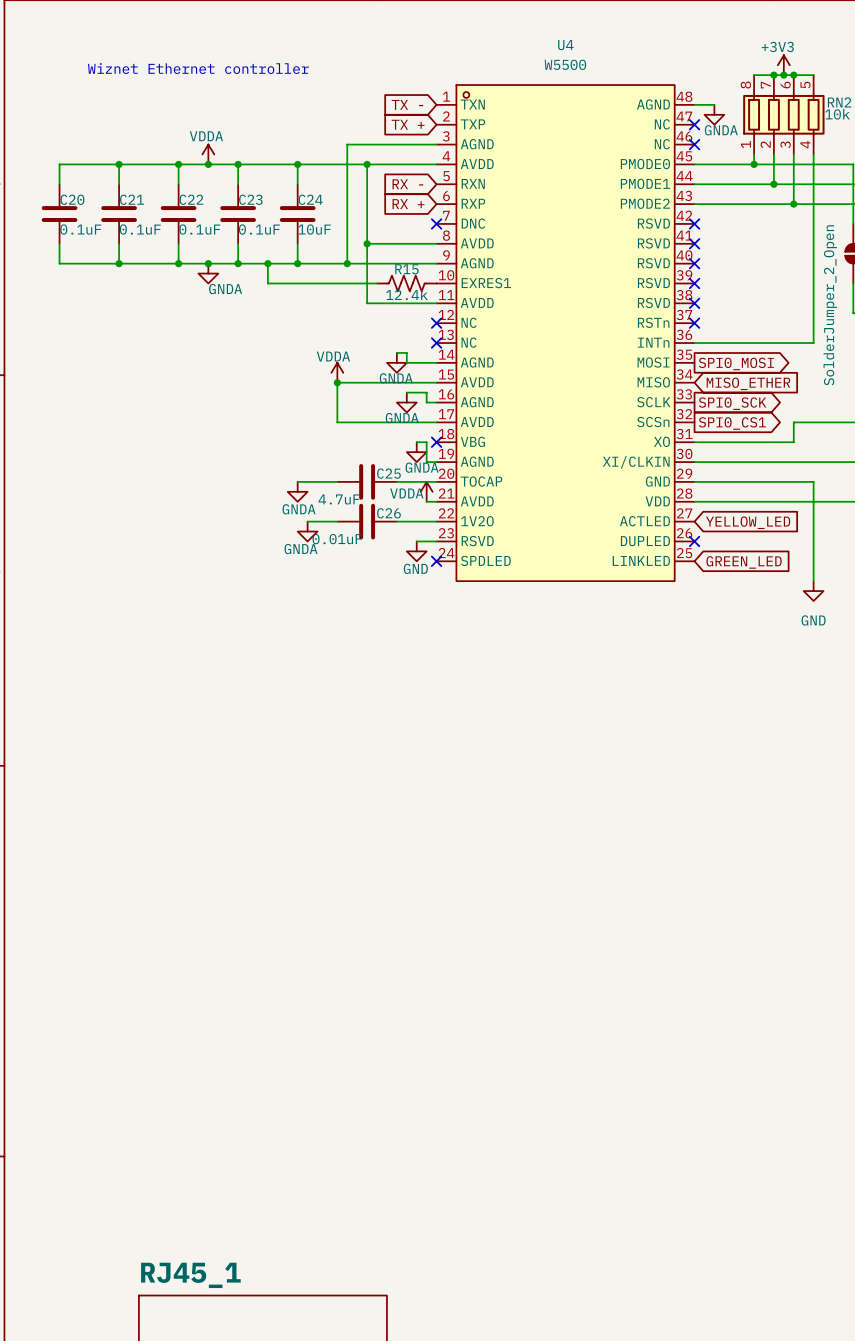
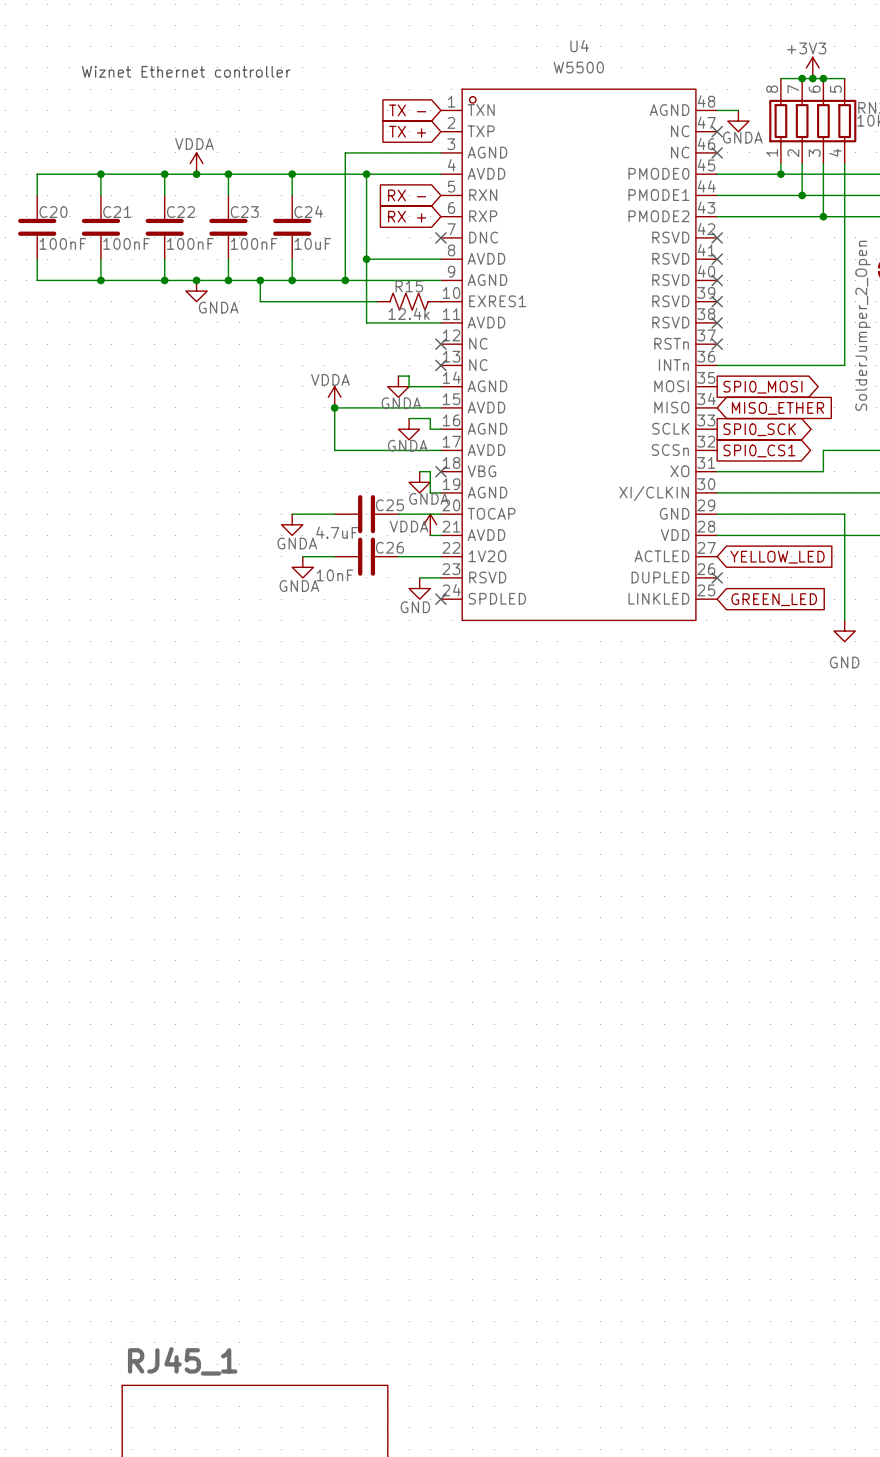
C20 value: 0.1uF (80, 229) -> 100nF (62, 243)
C21 value: 0.1uF (140, 229) -> 100nF (126, 243)
C22 value: 0.1uF (199, 229) -> 100nF (190, 243)
C23 value: 0.1uF (259, 229) -> 100nF (254, 243)
C26 value: 0.01uF (337, 539) -> 10nF (334, 575)

